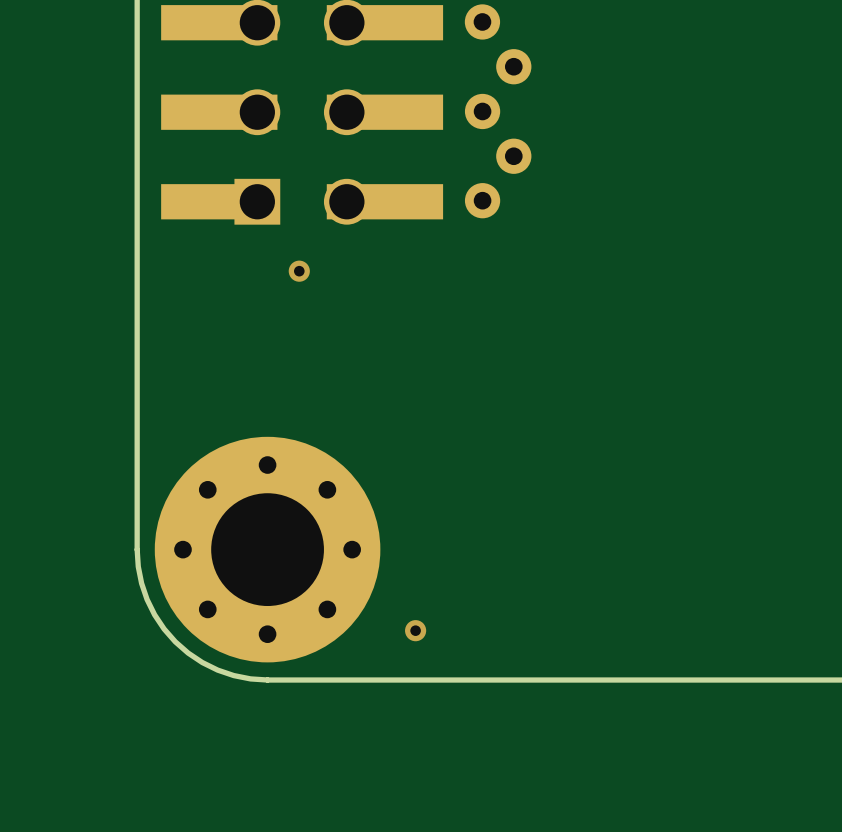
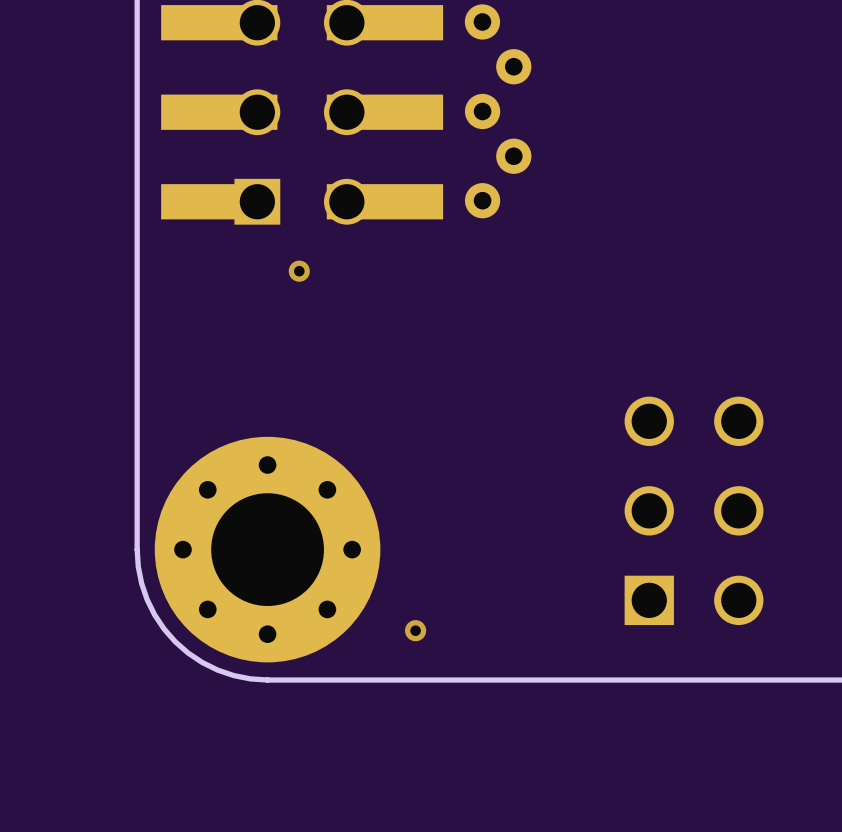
part: none -> (694, 510)

